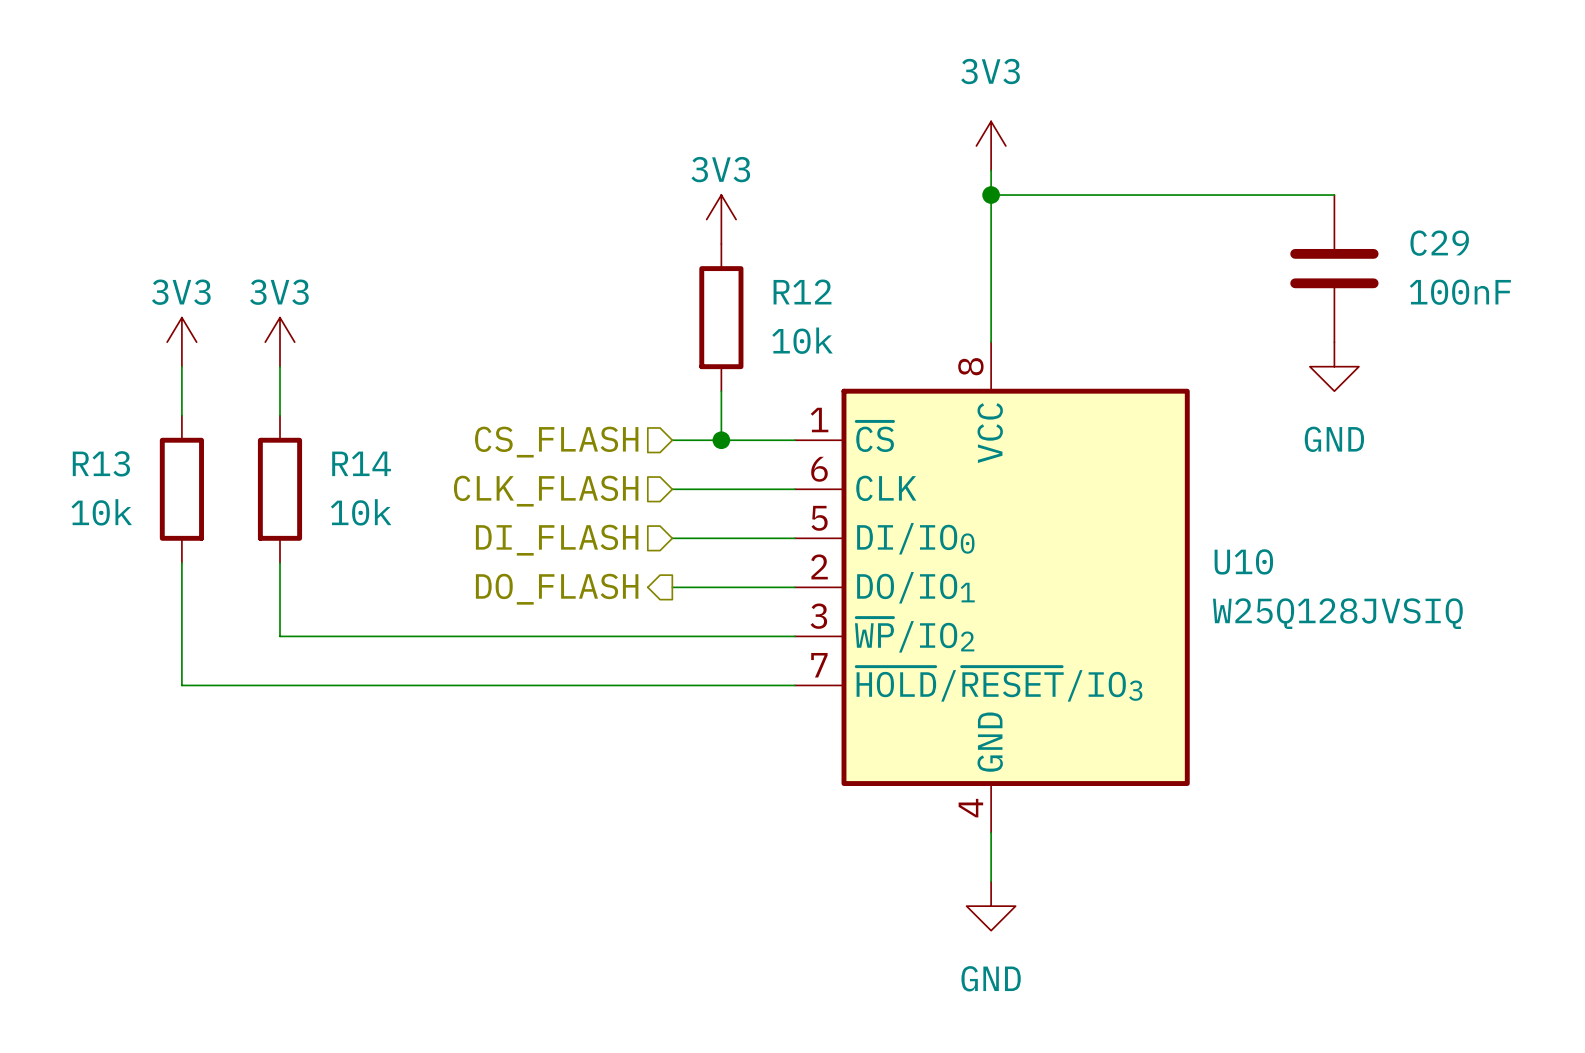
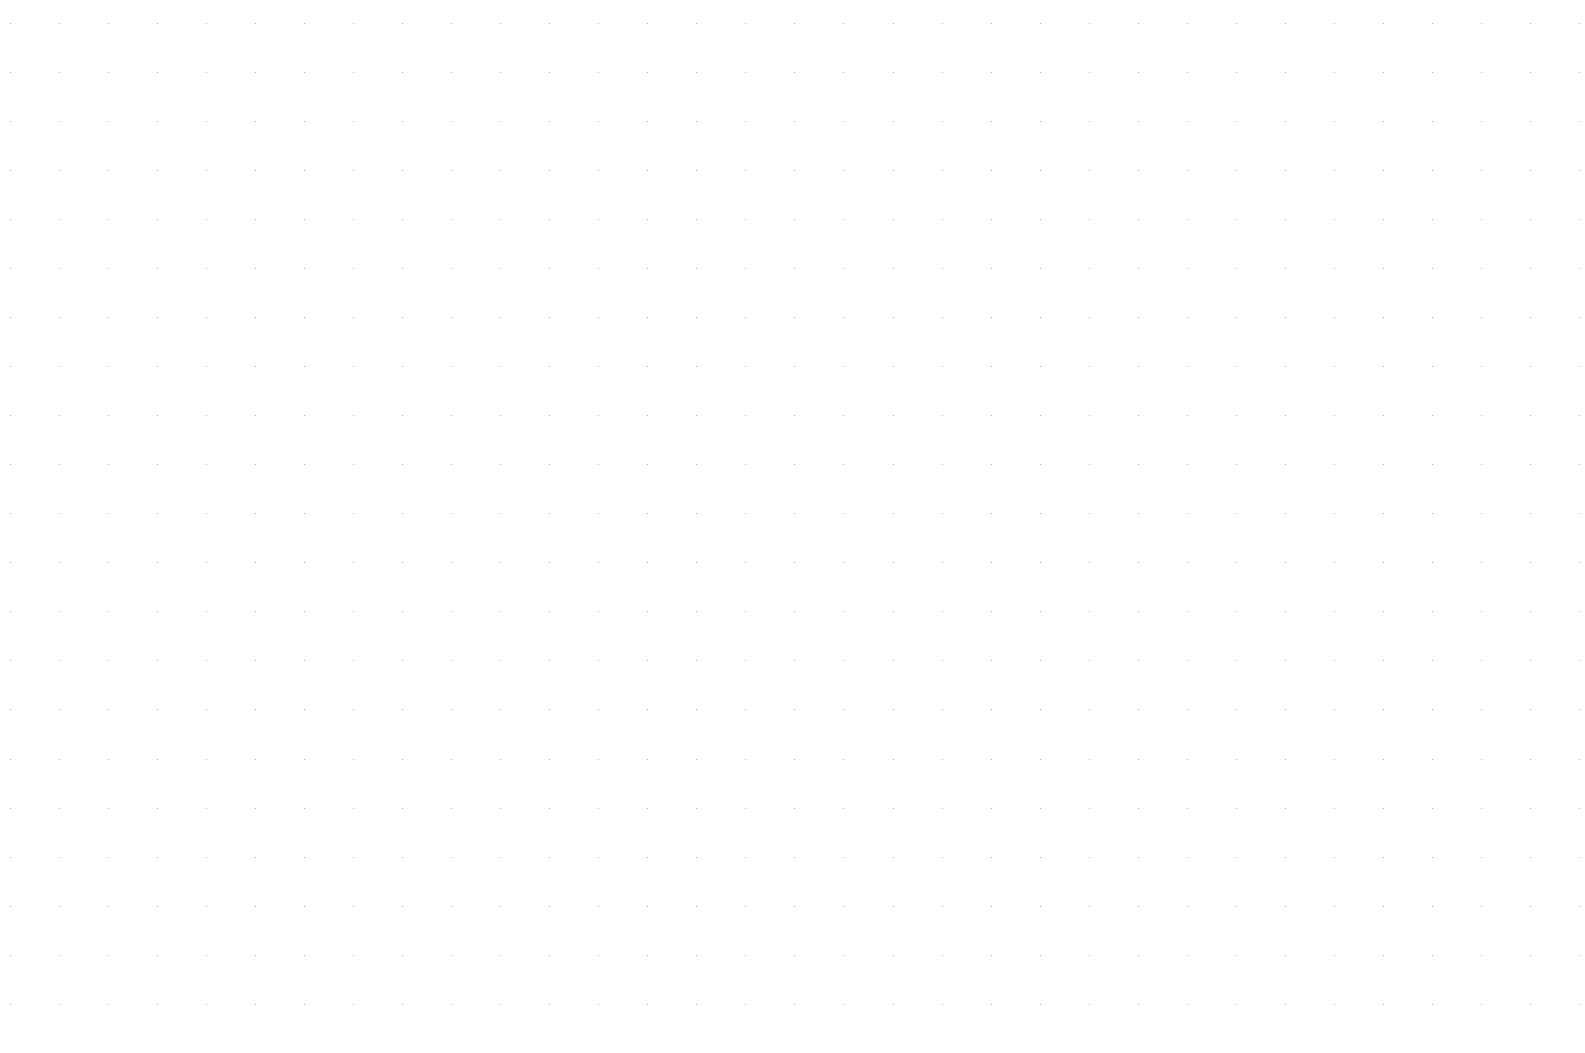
power symbol: 3V3 (991, 145) -> none
wire: (991, 170) (991, 342) -> none
wire: (991, 195) (1334, 195) -> none
junction: (991, 195) -> none
power symbol: 3V3 (721, 219) -> none
C29: 100nF (1334, 268) -> none
R12: 10k (721, 317) -> none
power symbol: 3V3 (181, 342) -> none
power symbol: 3V3 (279, 342) -> none
wire: (181, 366) (181, 415) -> none
wire: (279, 366) (279, 415) -> none
power symbol: GND (1334, 366) -> none
wire: (721, 391) (721, 440) -> none
wire: (672, 440) (794, 440) -> none
junction: (721, 440) -> none
hierarchical label: CS_FLASH (556, 442) -> none
R13: 10k (181, 489) -> none
R14: 10k (279, 489) -> none
wire: (672, 489) (794, 489) -> none
hierarchical label: CLK_FLASH (546, 491) -> none
wire: (672, 538) (794, 538) -> none
hierarchical label: DI_FLASH (557, 540) -> none
wire: (181, 562) (181, 685) (794, 685) -> none
wire: (279, 562) (279, 636) (794, 636) -> none
wire: (672, 587) (794, 587) -> none
U10: W25Q128JVSIQ (992, 587) -> none
hierarchical label: DO_FLASH (557, 589) -> none
wire: (991, 832) (991, 881) -> none
power symbol: GND (991, 906) -> none

